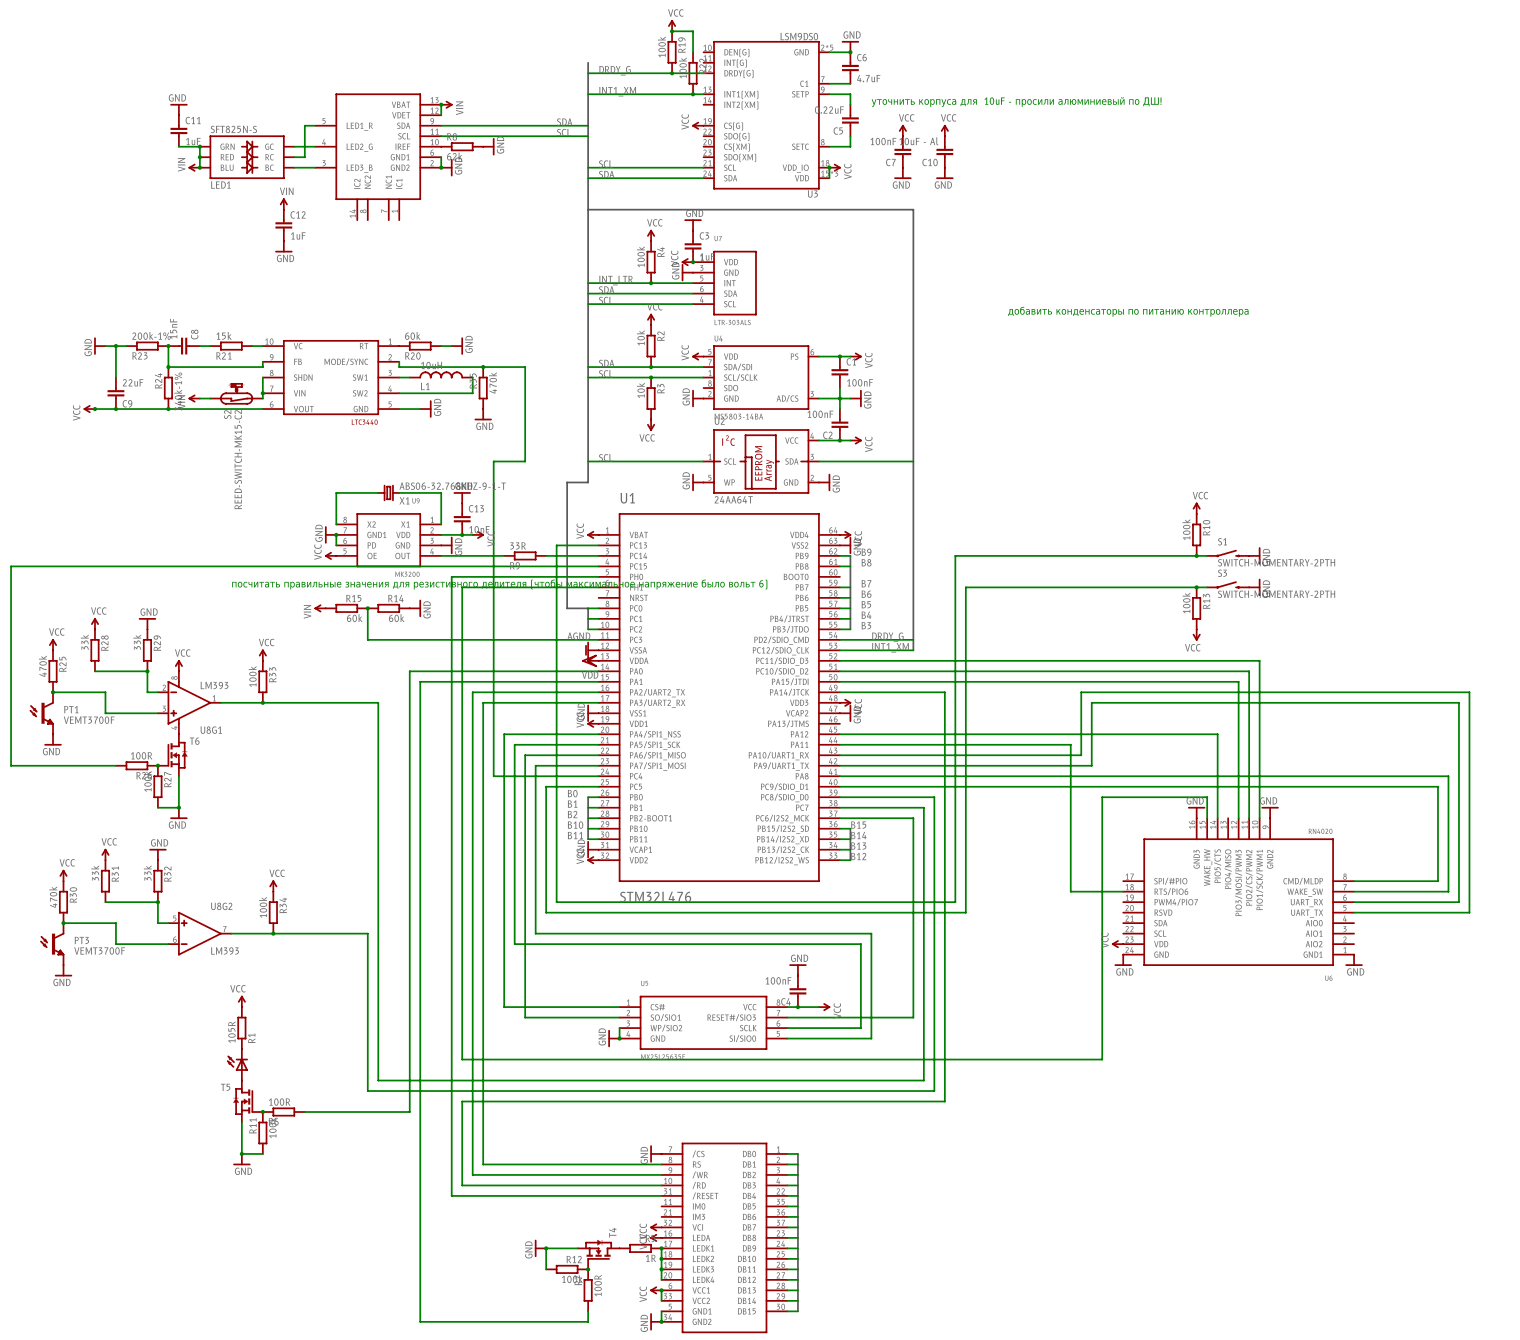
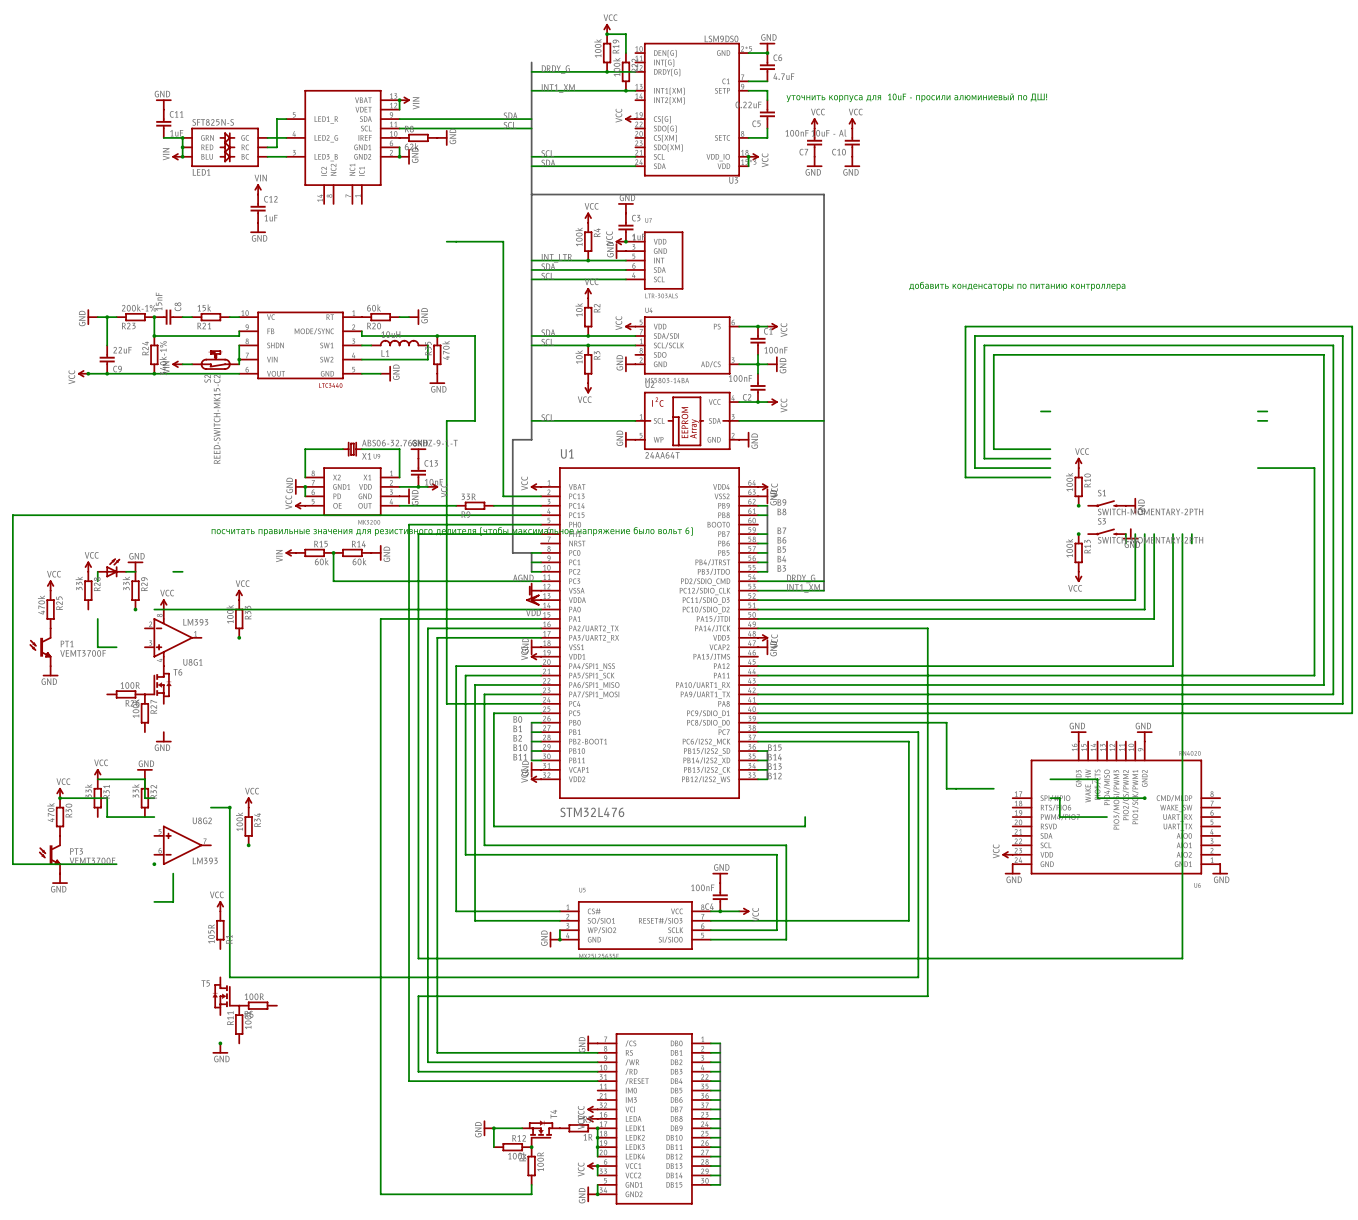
wire: none -> (1040, 411) (1050, 411)
wire: none -> (1257, 411) (1267, 411)
wire: none -> (1257, 420) (1267, 420)
wire: none -> (1050, 449) (993, 449) (993, 354) (1323, 354) (1323, 628)
wire: none -> (1257, 468) (1314, 468) (1314, 637)
wire: (556, 545) (556, 902) (955, 902) (955, 555) (1207, 555) -> (503, 496) (503, 241) (446, 241)
wire: (1207, 587) (965, 587) (965, 912) (892, 912) -> (805, 817) (805, 826)
wire: none -> (1125, 534) (1125, 543)
power symbol rotation: 0° (1259, 587) -> 90° clockwise (1130, 538)
wire: none -> (1191, 534) (1191, 543)
part: none -> (111, 567)
wire: none -> (97, 571) (97, 581)
wire: none -> (126, 571) (135, 571)
wire: none -> (173, 571) (182, 571)
wire: (1259, 660) (1259, 818) -> (1135, 600) (1135, 534)
wire: (94, 671) (147, 671) (147, 692) (157, 692) -> none
wire: (409, 671) (409, 1112) (304, 1112) -> (371, 609) (154, 609)
wire: (1249, 671) (1249, 818) -> (1125, 609) (1144, 609) (1144, 534)
wire: (1238, 681) (1238, 818) -> (1116, 618) (1154, 618) (1154, 534)
wire: (53, 692) (105, 692) -> (97, 618) (97, 628)
junction: (53, 692) -> none
wire: (944, 692) (944, 1101) -> (852, 628) (927, 628) (927, 996) (852, 996)
wire: (1469, 692) (1081, 692) (1081, 755) -> (1323, 684) (974, 684)
wire: (220, 702) (378, 702) (378, 1080) -> (210, 807) (229, 807) (229, 977) (342, 977)
wire: (1458, 702) (1091, 702) (1091, 765) -> (1050, 458) (984, 458) (984, 345) (1333, 345) (1333, 694) (984, 694)
wire: (126, 713) (157, 713) -> none
wire: (1217, 734) (1217, 818) -> (1097, 666) (1173, 666) (1173, 534)
wire: (1070, 744) (1070, 891) (1123, 891) -> none
wire: (1458, 744) (1458, 902) (1354, 902) -> (1314, 675) (965, 675)
wire: (1469, 755) (1469, 912) (1354, 912) -> none
wire: (11, 765) (115, 765) -> (12, 694) (12, 864) (116, 864)
junction: (157, 765) -> none
wire: (178, 776) (178, 807) (157, 807) -> none
wire: (1448, 776) (1448, 891) (1354, 891) -> (1305, 703) (1342, 703) (1342, 336) (974, 336) (974, 468) (1050, 468)
wire: (1437, 786) (1437, 881) (1354, 881) -> (1295, 713) (1352, 713) (1352, 326) (965, 326) (965, 477) (1050, 477)
wire: (934, 797) (934, 1091) (367, 1091) (367, 933) (231, 933) -> (842, 722) (946, 722) (946, 788) (993, 788)
junction: (178, 807) -> none
wire: (923, 807) (923, 1080) -> (833, 732) (918, 732) (918, 977) (833, 977)
wire: (913, 818) (913, 1017) -> (824, 741) (908, 741) (908, 920) (824, 920)
wire: (1207, 818) (1207, 797) (1102, 797) (1102, 1059) -> (1182, 534) (1182, 958) (993, 958)
wire: none -> (97, 779) (144, 779) (144, 798) (154, 798)
wire: none -> (1050, 779) (1097, 779) (1097, 798) (1144, 798)
junction: none -> (60, 798)
wire: none -> (1050, 798) (1059, 798) (1059, 817) (1106, 817)
junction: none -> (1144, 798)
junction: none -> (229, 807)
wire: (105, 902) (115, 902) -> (60, 798) (107, 798) (107, 817)
wire: (157, 902) (157, 923) (168, 923) -> (144, 817) (154, 817)
junction: (157, 902) -> none
wire: (63, 923) (115, 923) (115, 944) (168, 944) -> none
junction: (63, 923) -> none
junction: none -> (154, 864)
wire: none -> (173, 873) (173, 901) (154, 901)
part: (237, 1064) -> none
junction: (262, 1112) -> none
wire: (241, 1122) (241, 1153) (262, 1153) -> none

